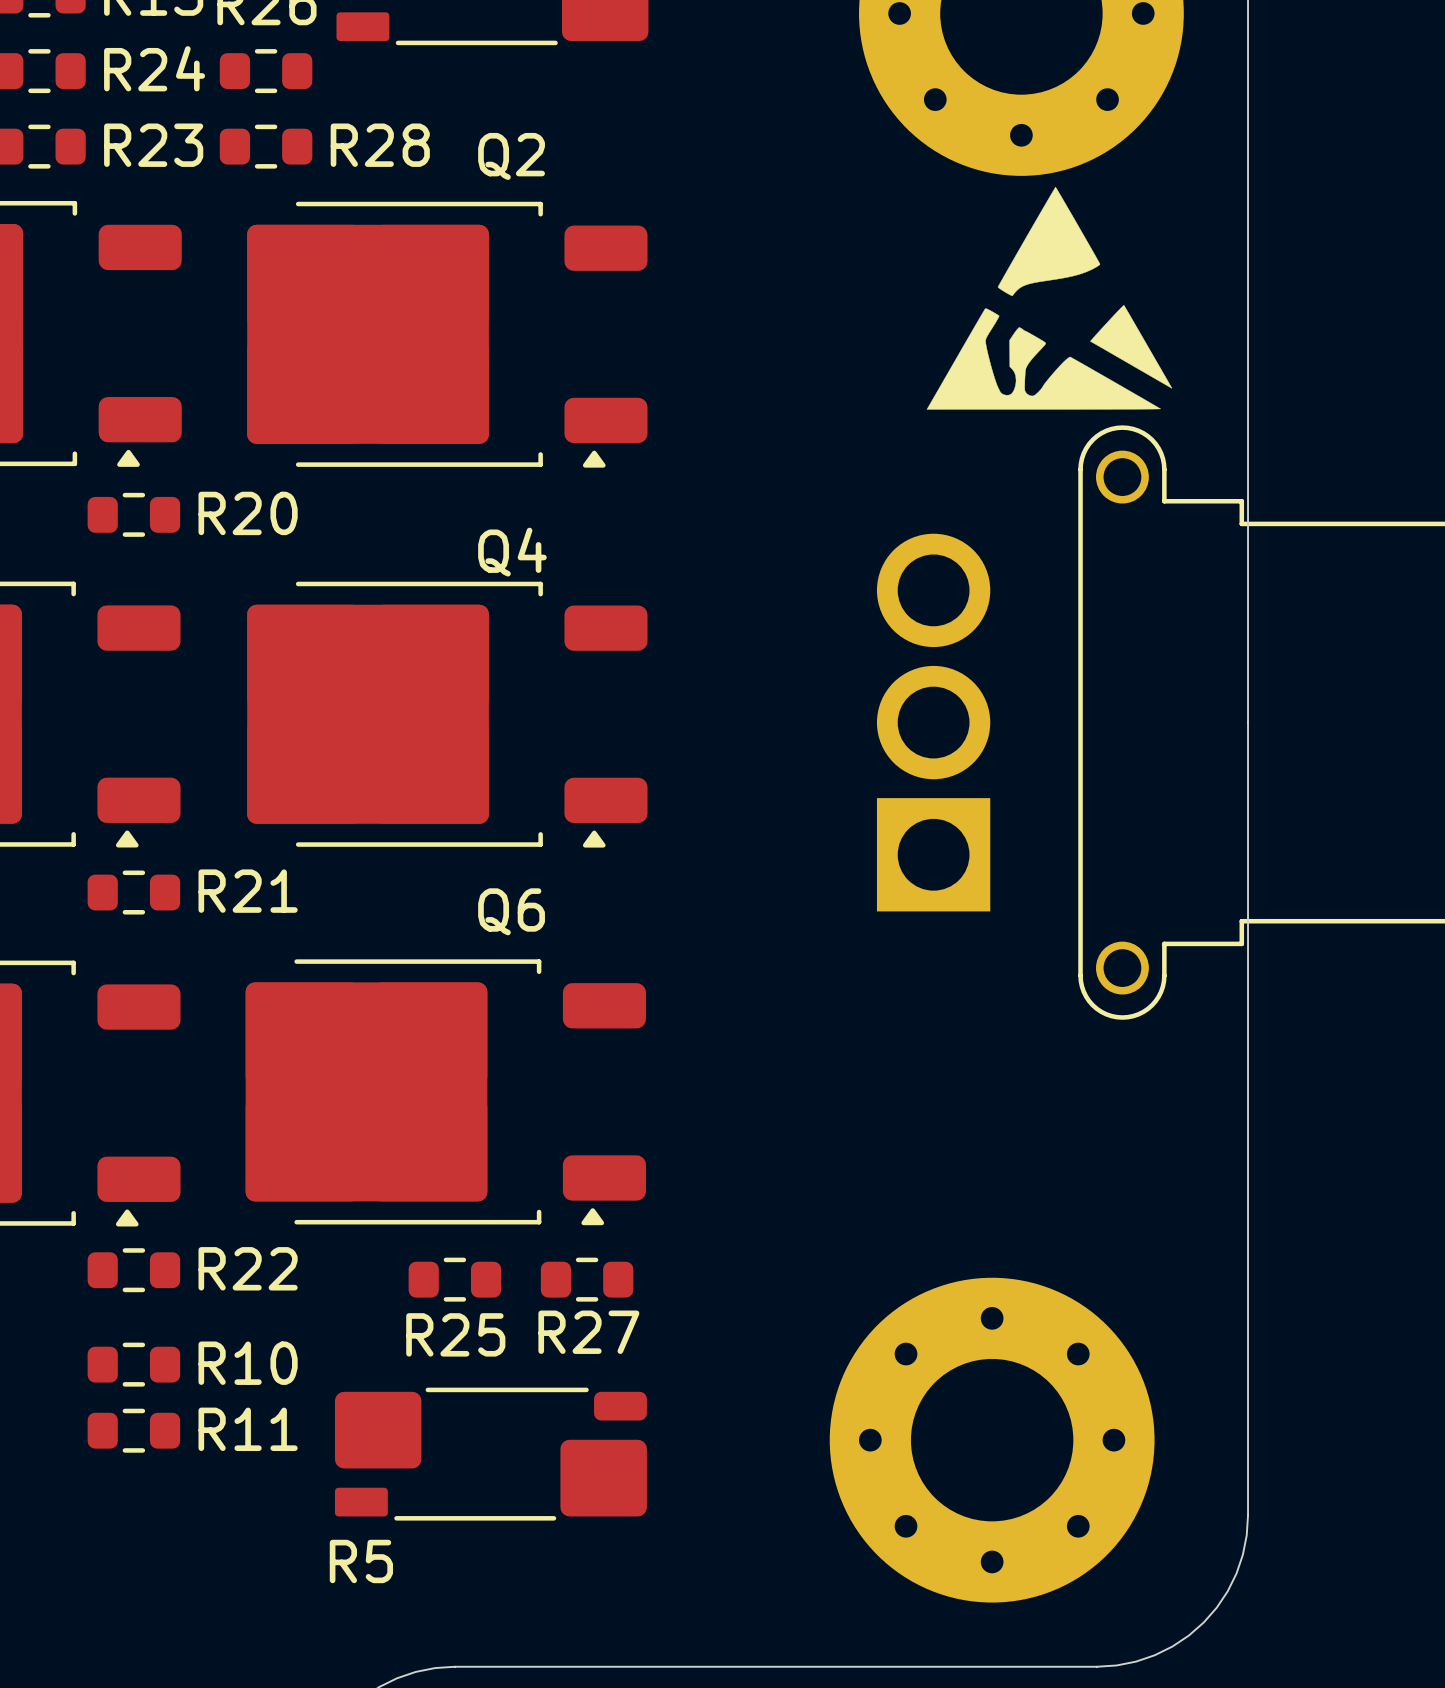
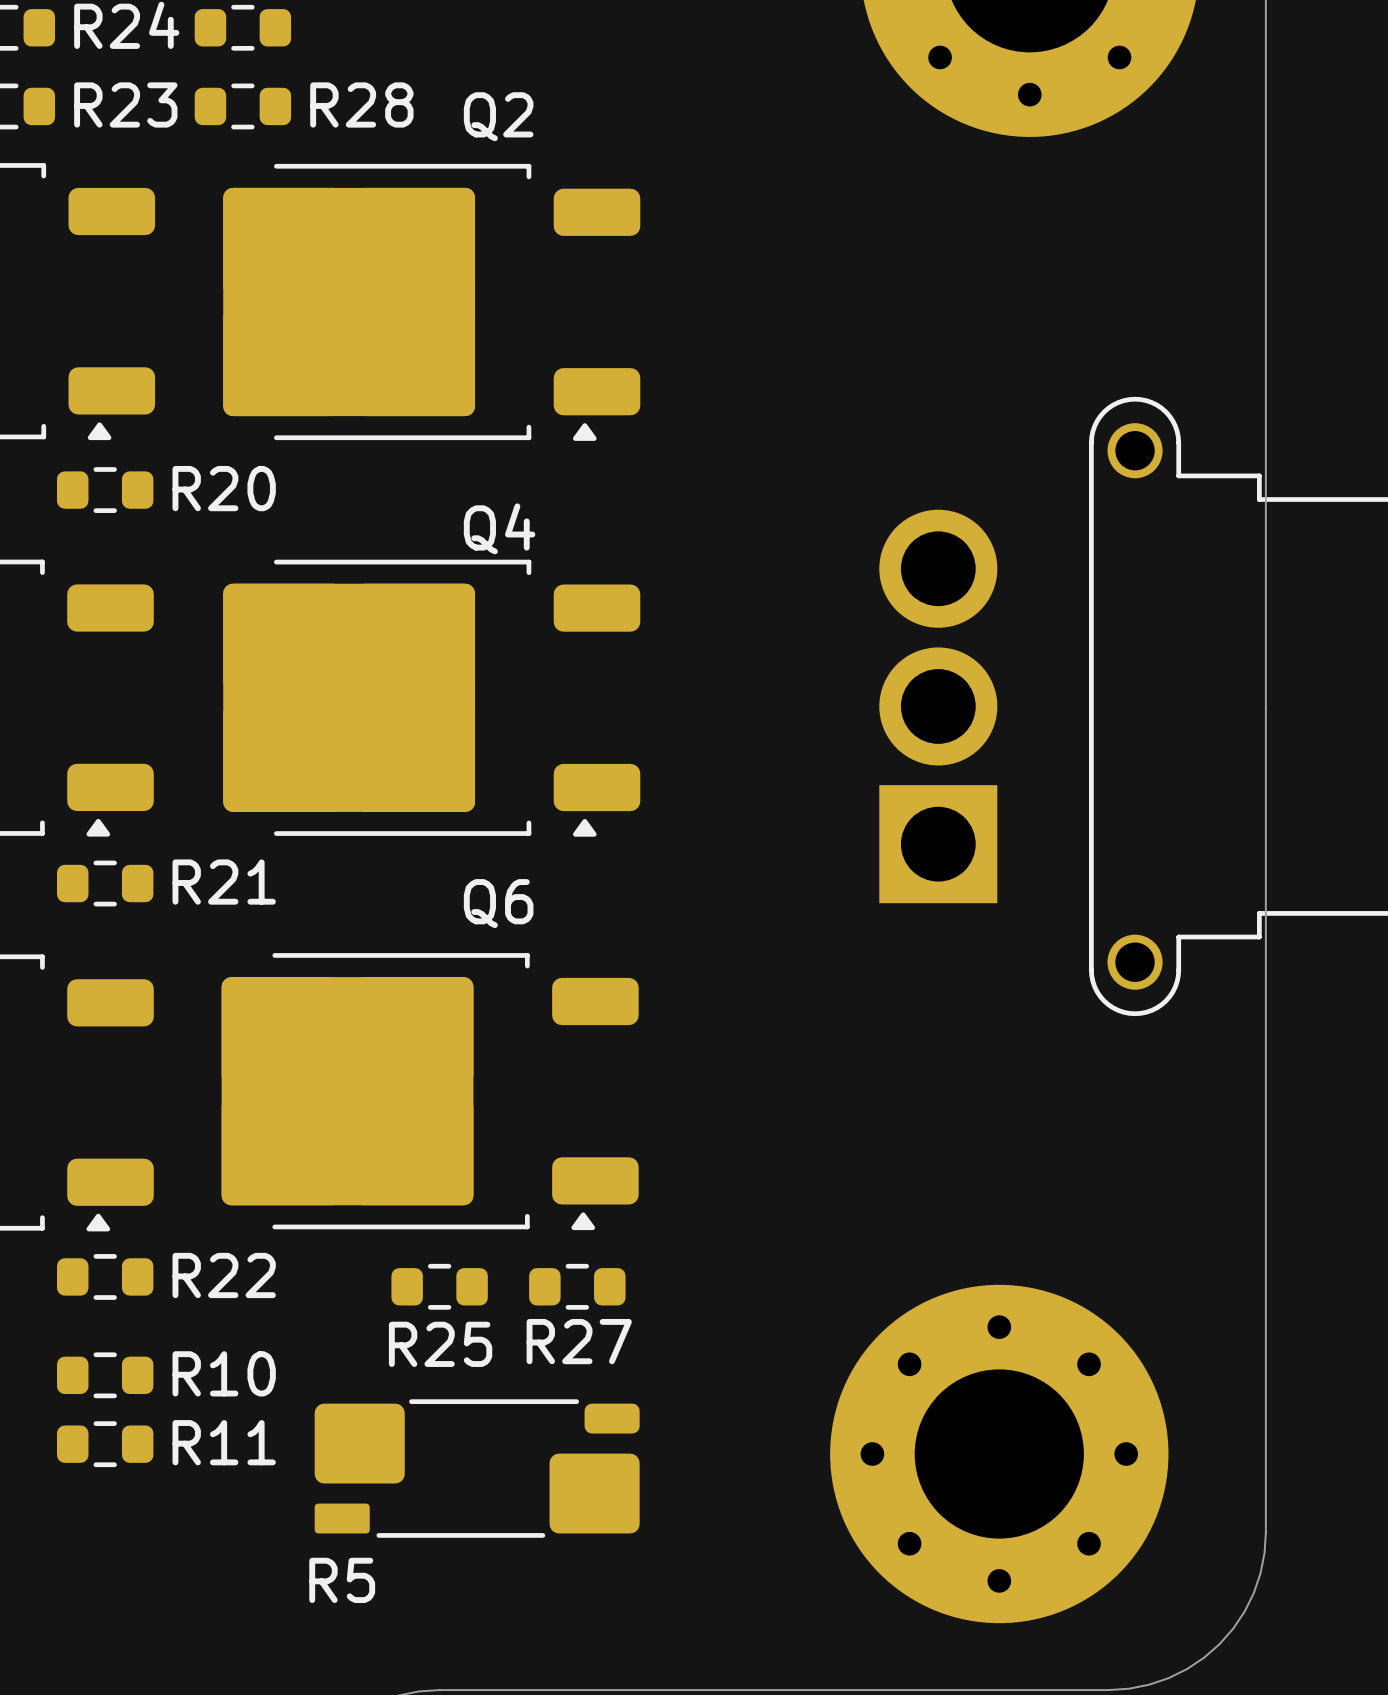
drawing: [926, 186, 1173, 410] -> none

